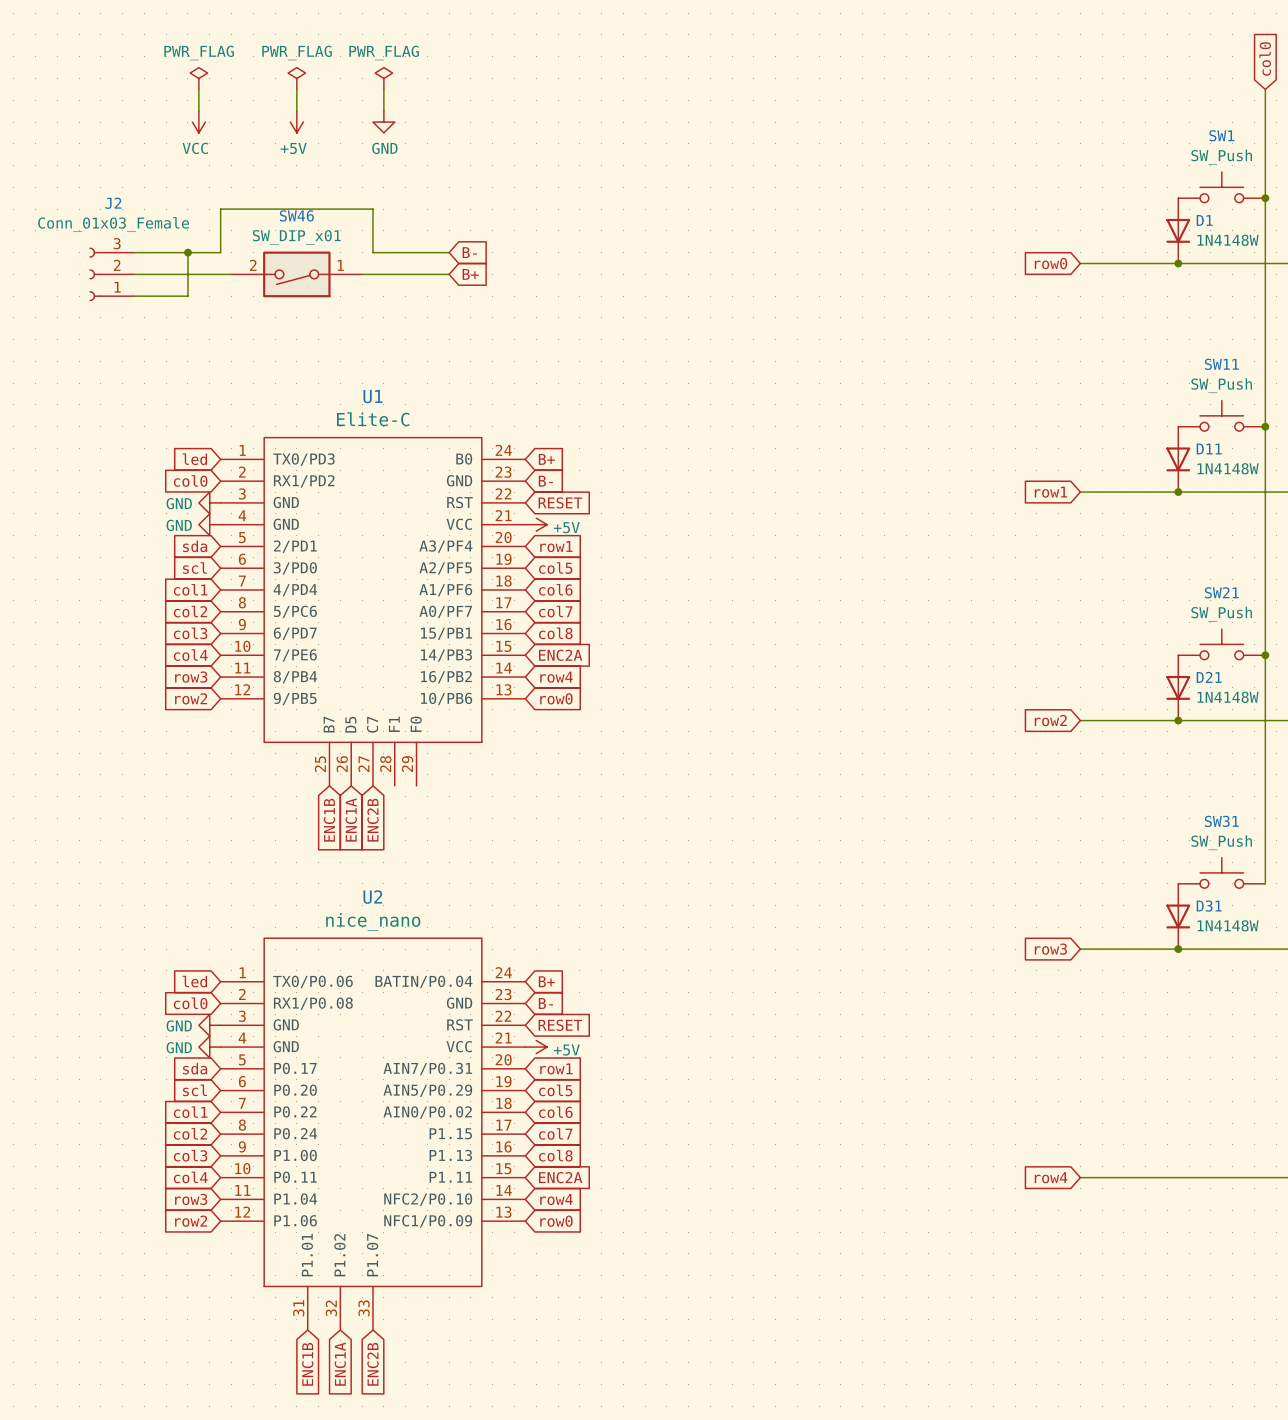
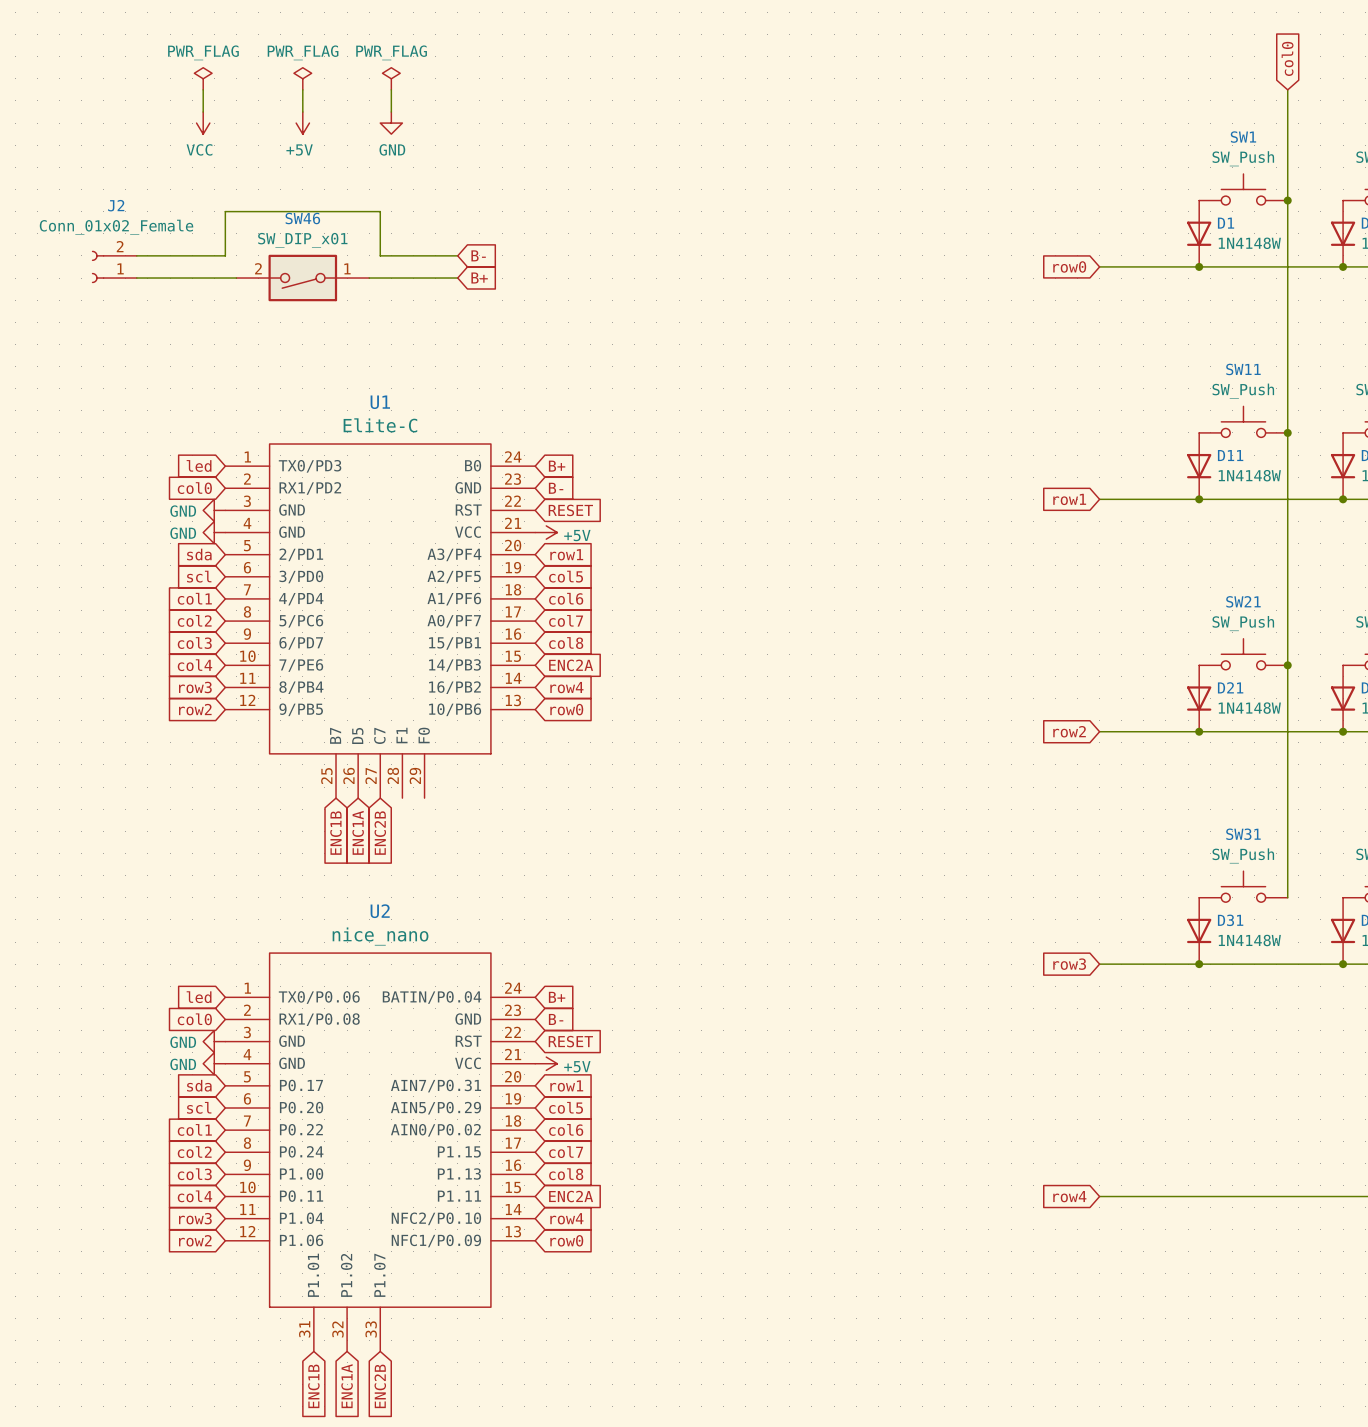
J2 value: Conn_01x03_Female (113, 224) -> Conn_01x02_Female (116, 227)
J2 symbol: [89, 247, 134, 302] -> [91, 250, 137, 284]
wire: (187, 252) (187, 296) (133, 296) -> none
junction: (187, 252) -> none

